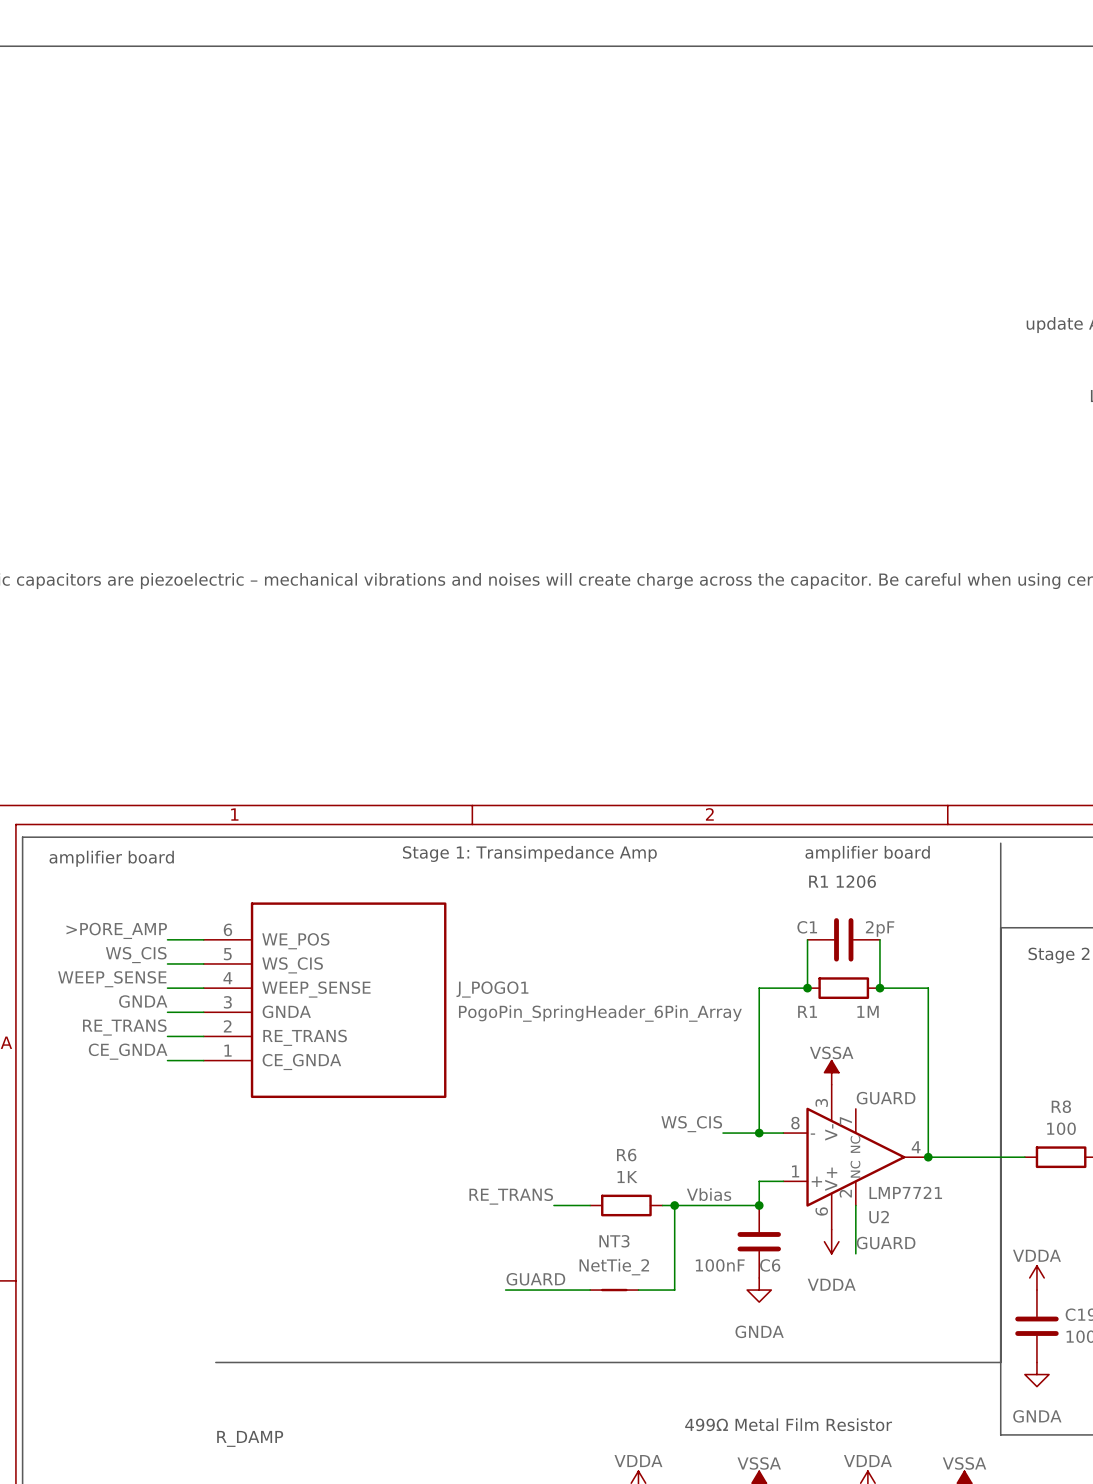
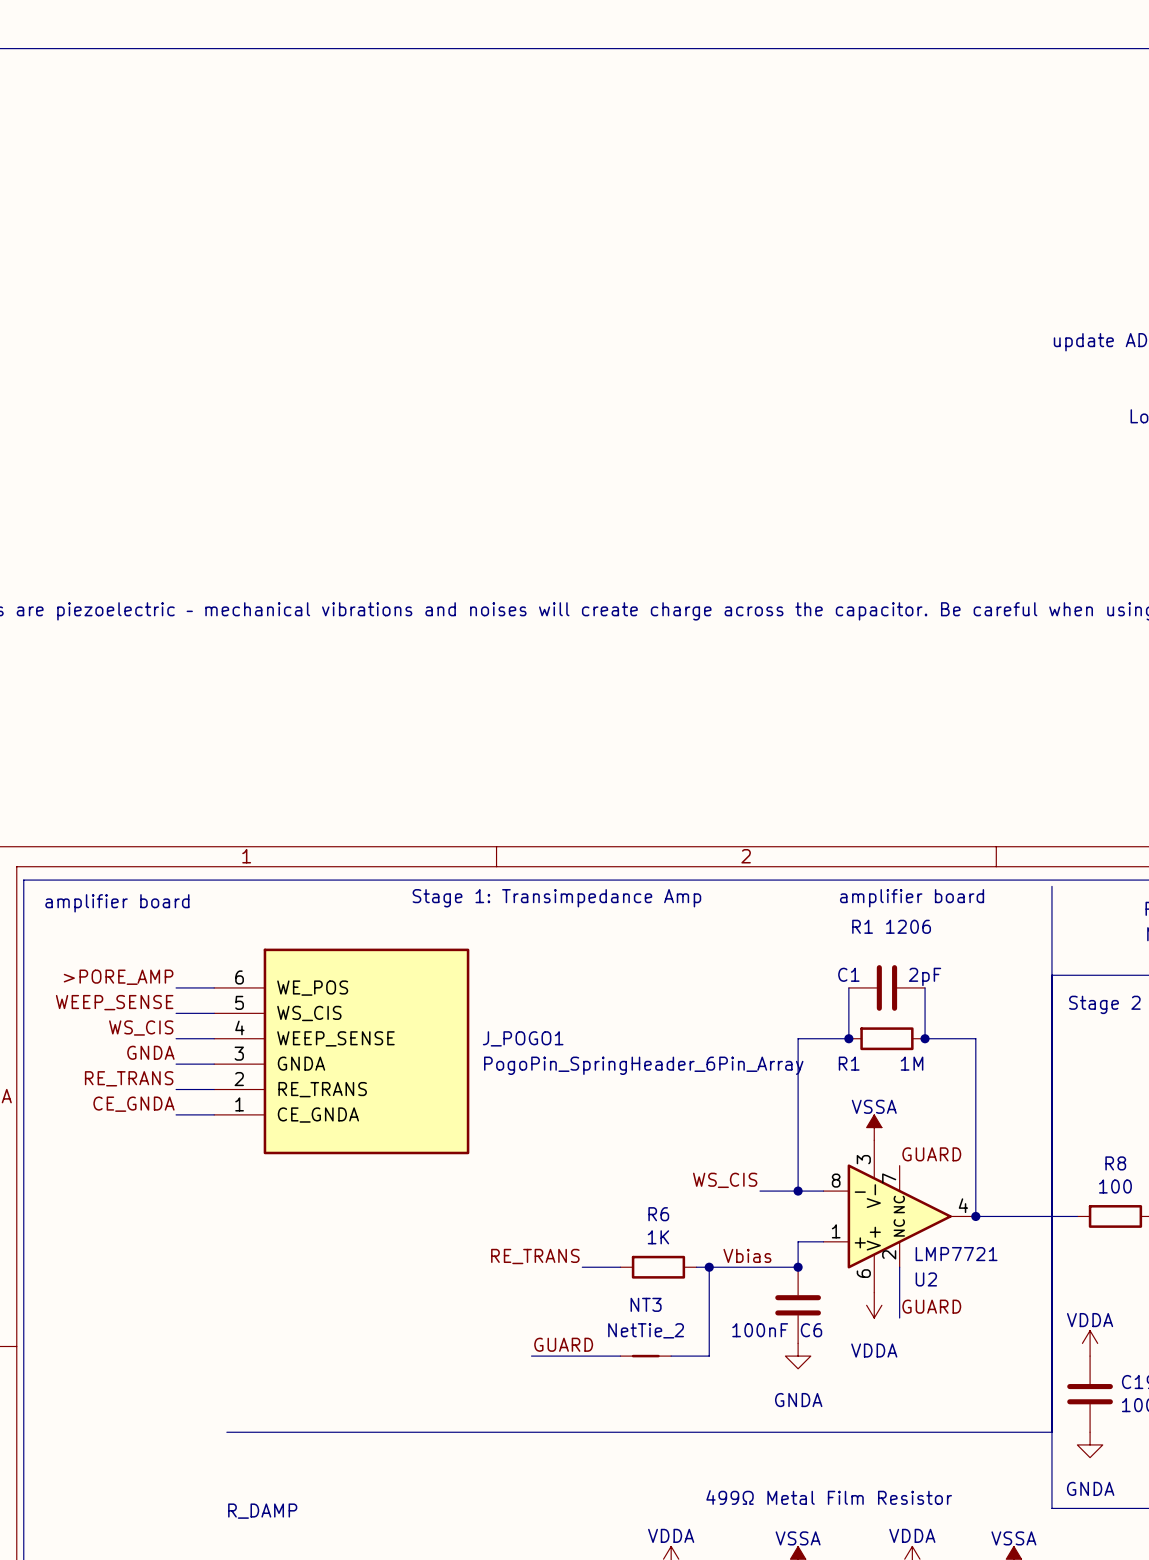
label: WS_CIS (136, 955) -> WEEP_SENSE (114, 1002)
label: WEEP_SENSE (112, 979) -> WS_CIS (141, 1028)

